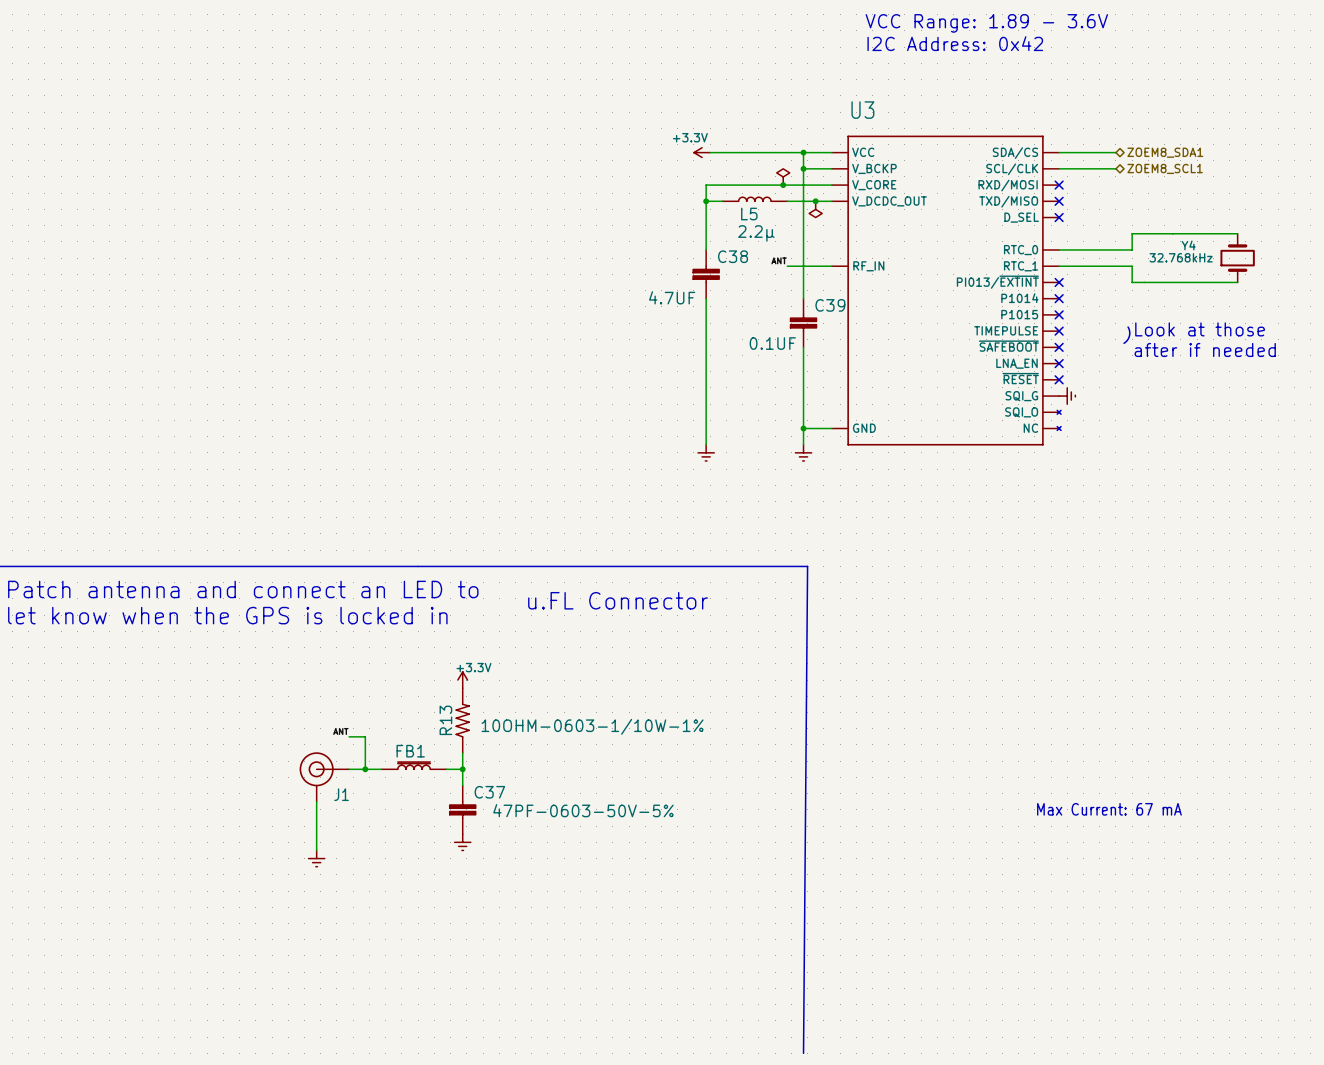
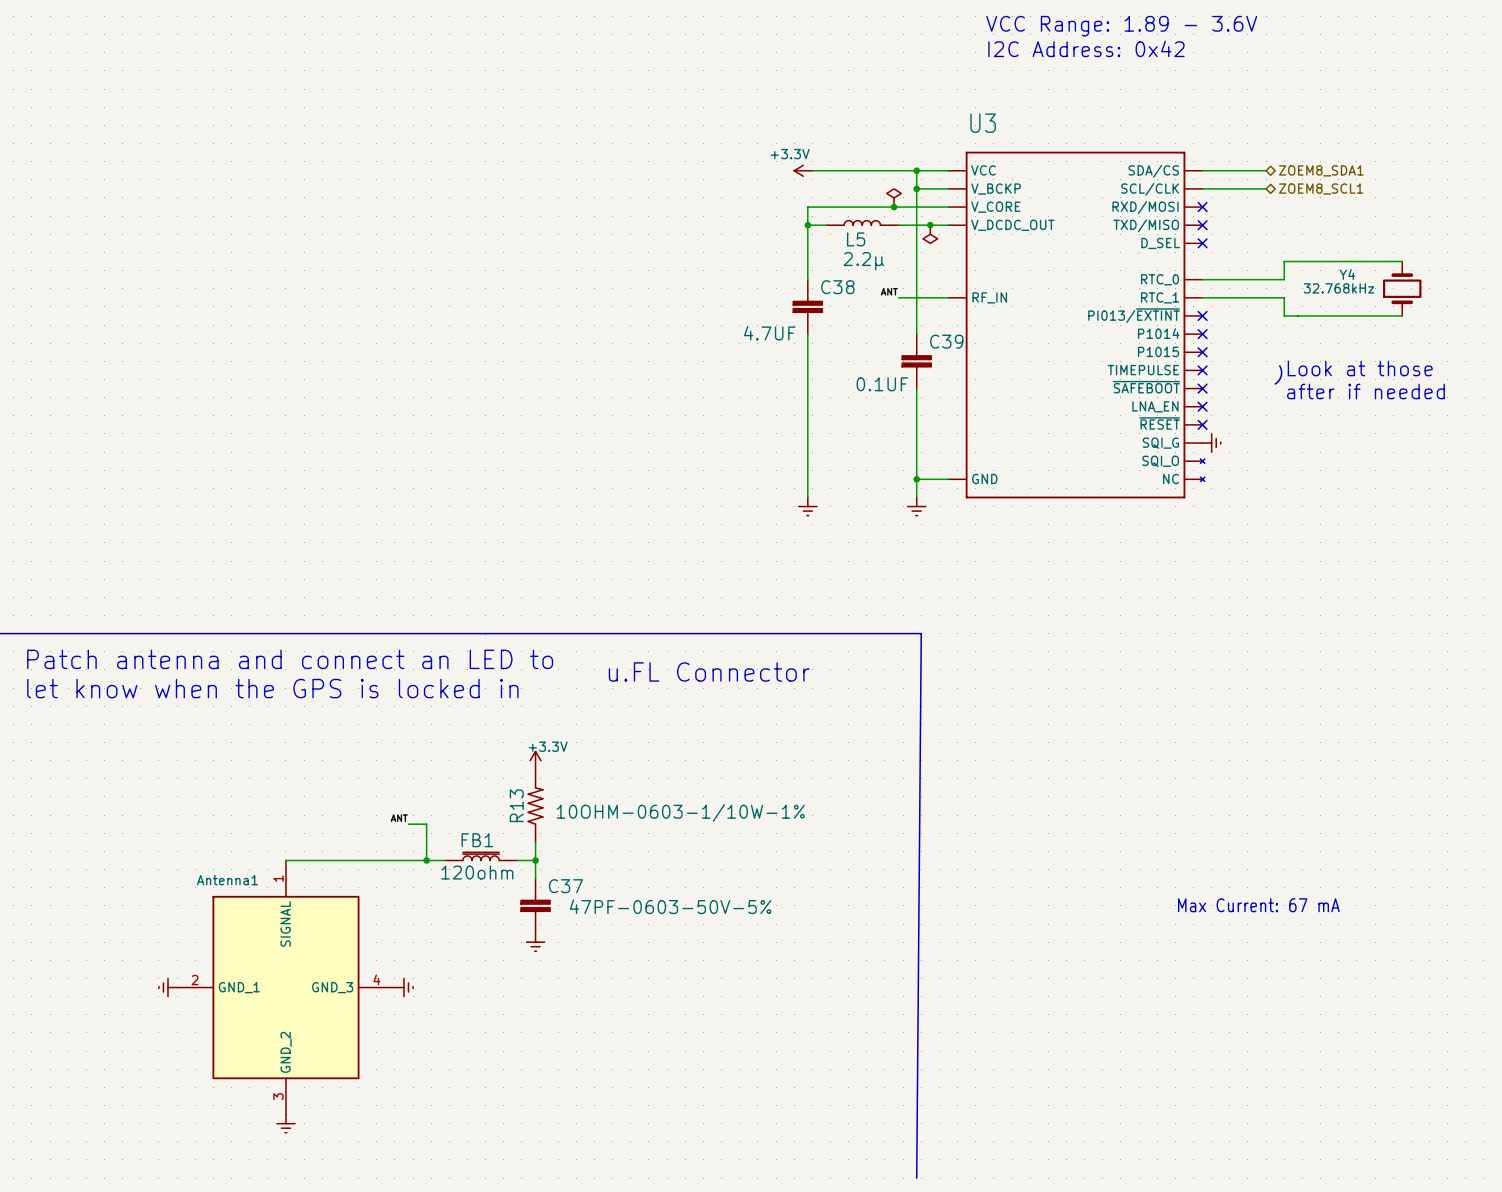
wire: none -> (285, 860) (408, 860)
J1: (324, 777) -> none
FB1 value: none -> 120ohm (477, 872)
wire: (316, 801) (316, 850) -> none
power symbol rotation: 0° (316, 858) -> 90° counterclockwise (403, 987)
power symbol position: (316, 858) -> (403, 987)
power symbol: none -> (167, 987)
Antenna1: none -> (285, 987)
power symbol: none -> (285, 1123)

